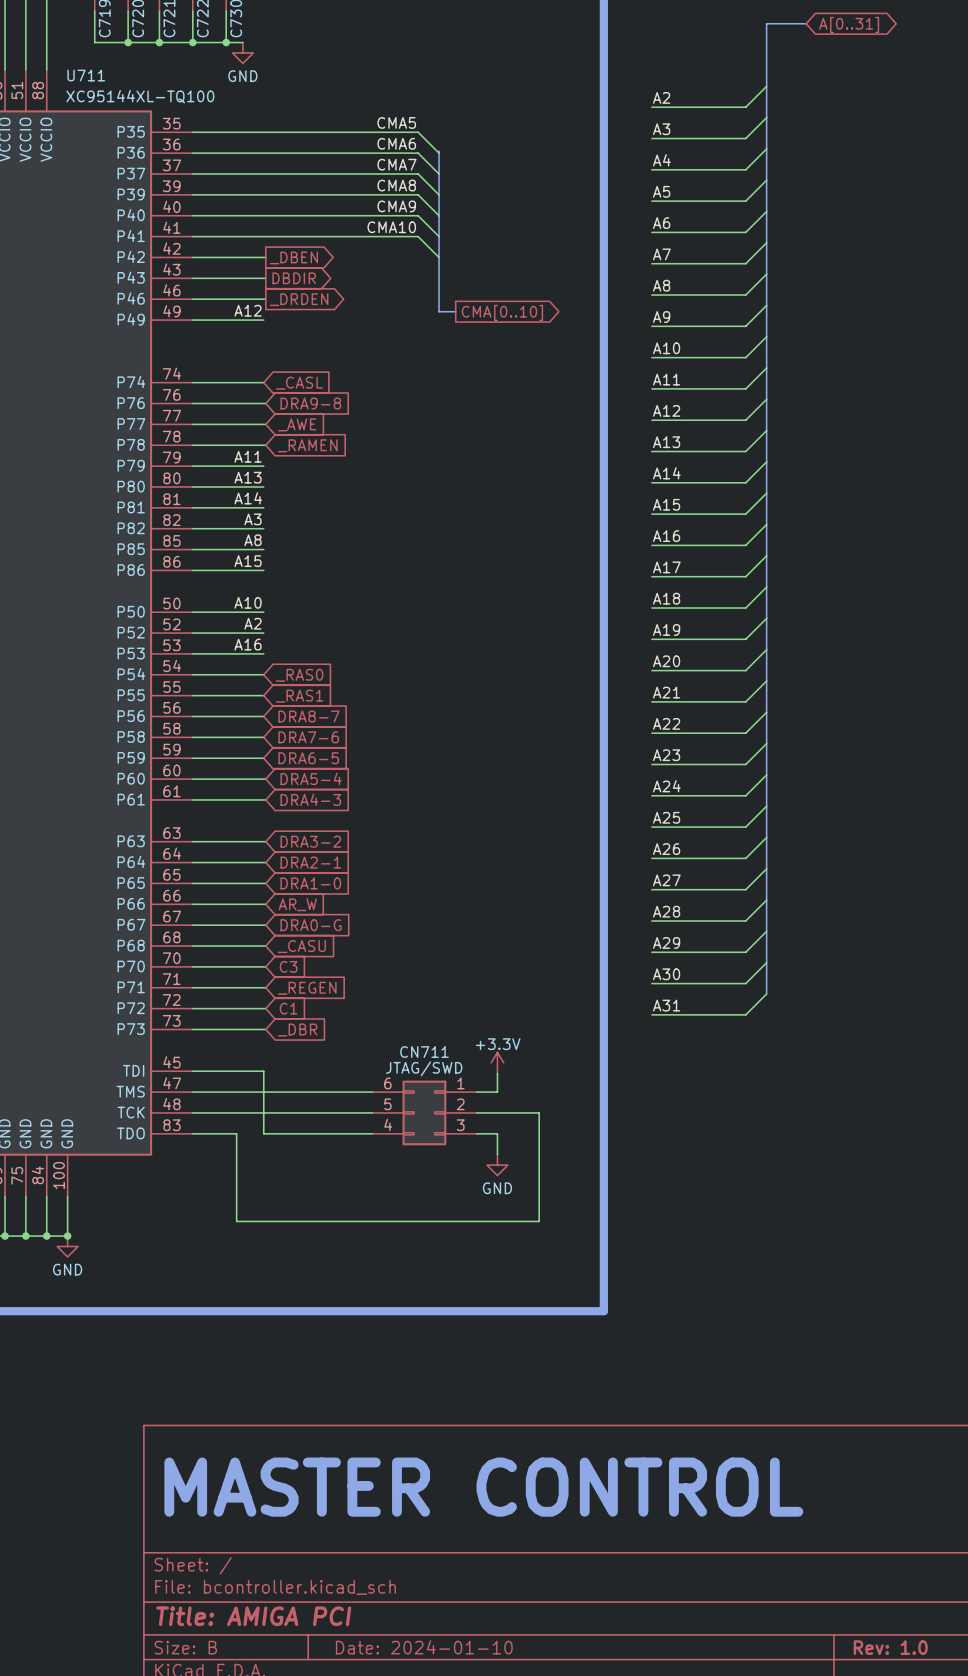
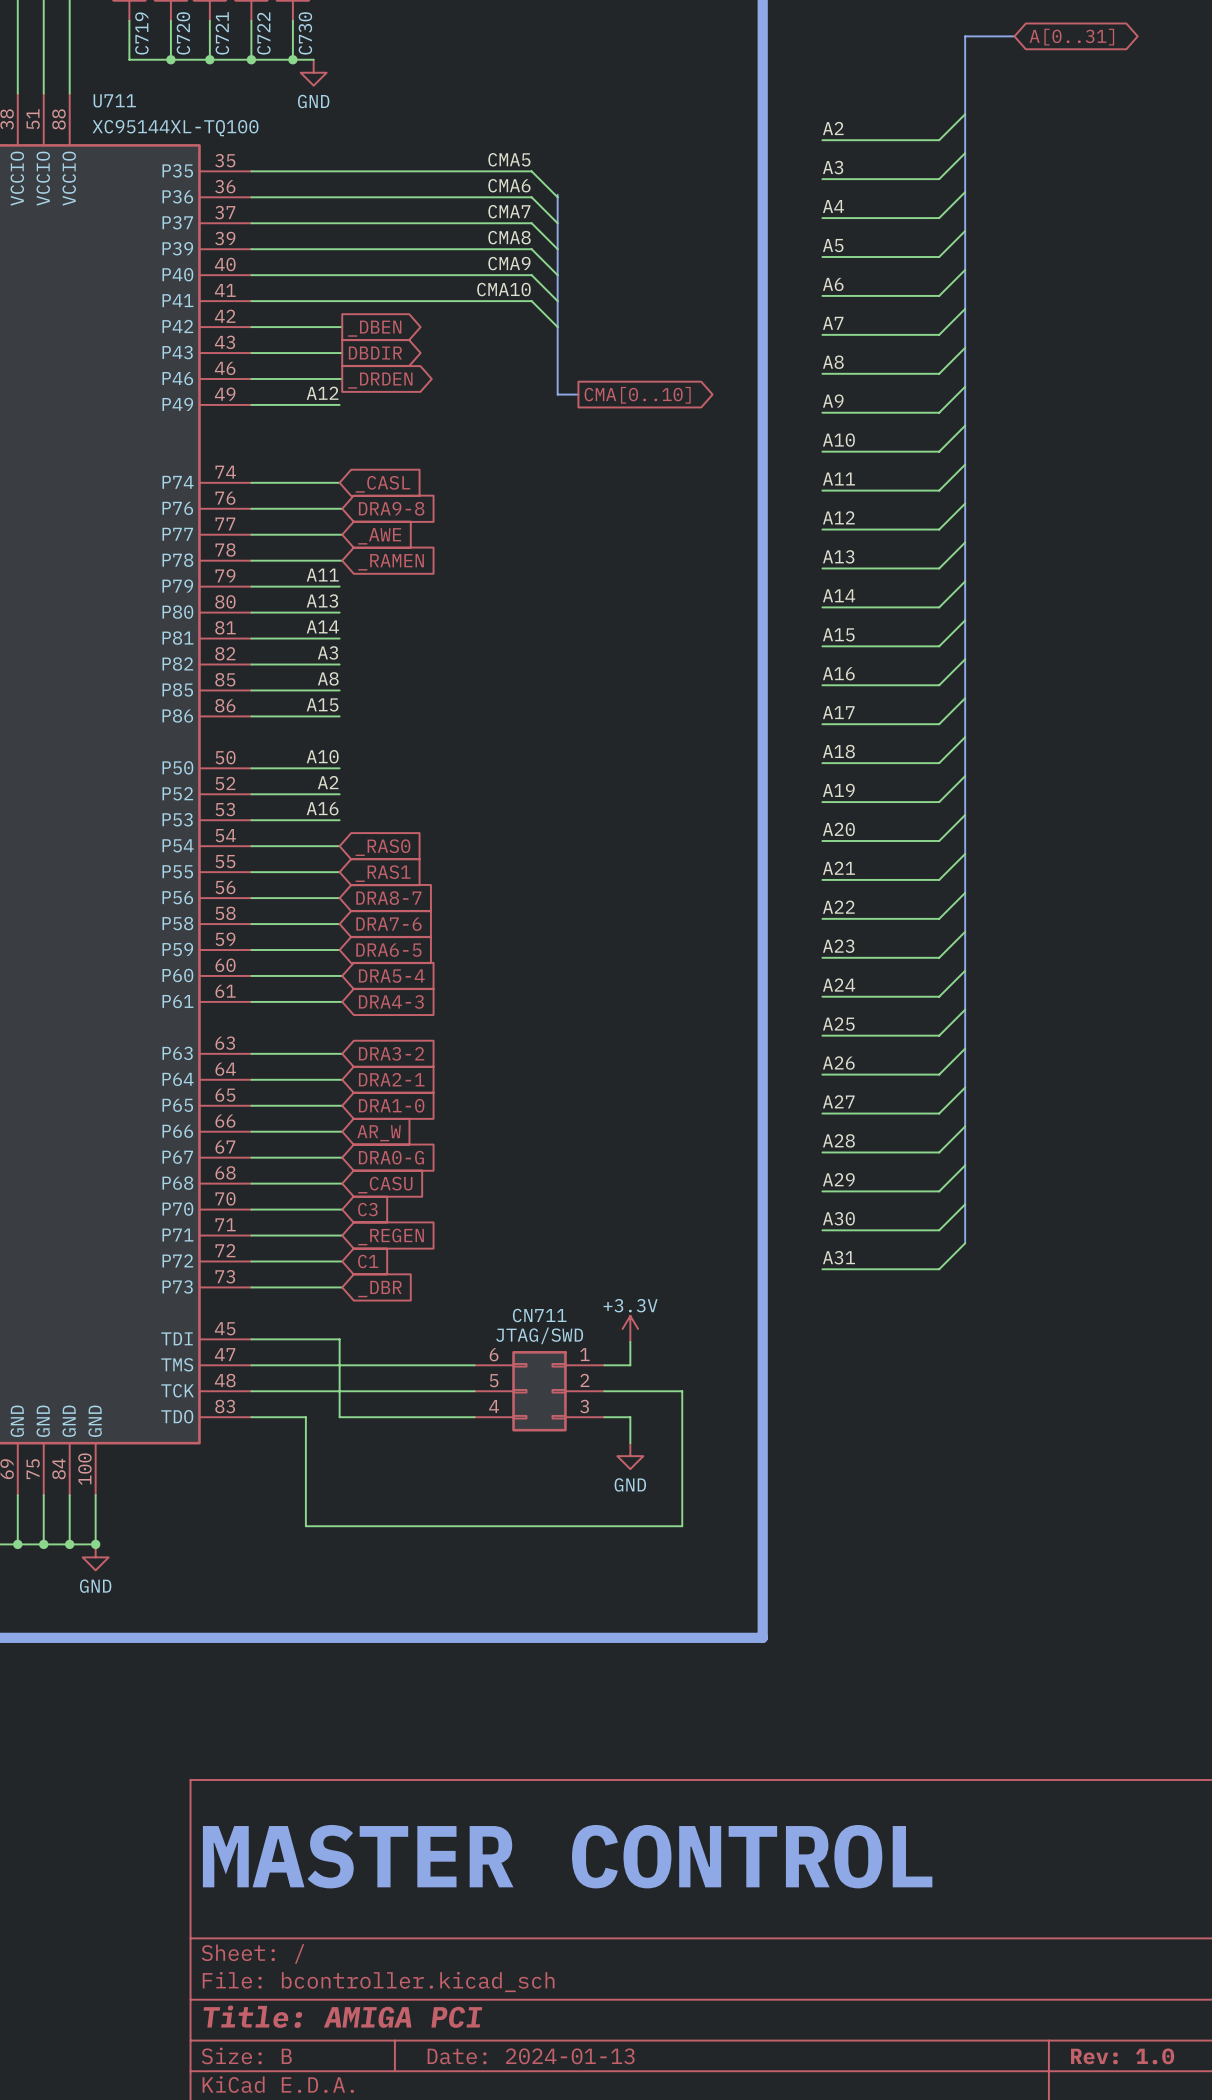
title block: Date: 2024-01-10 (424, 1647) -> Date: 2024-01-13 (531, 2056)

